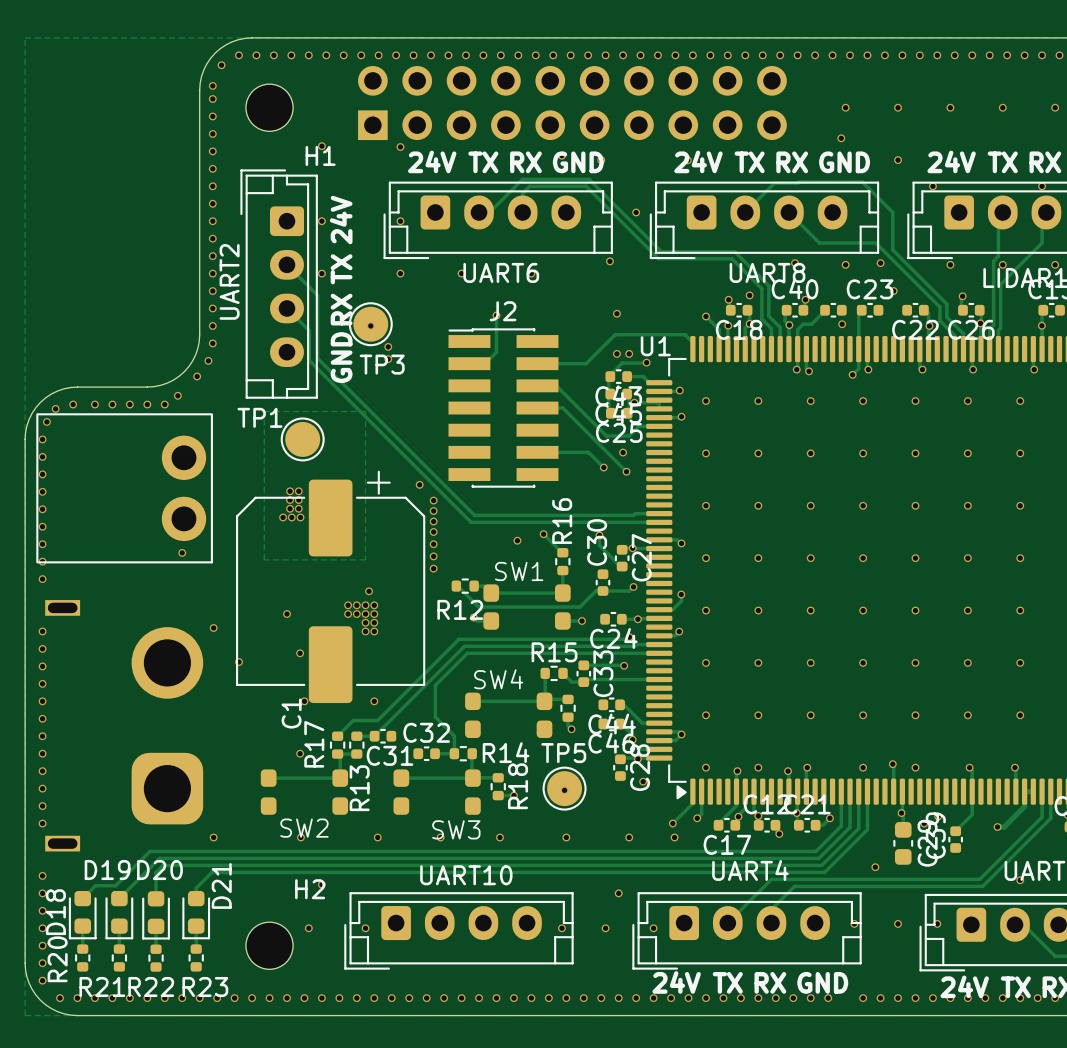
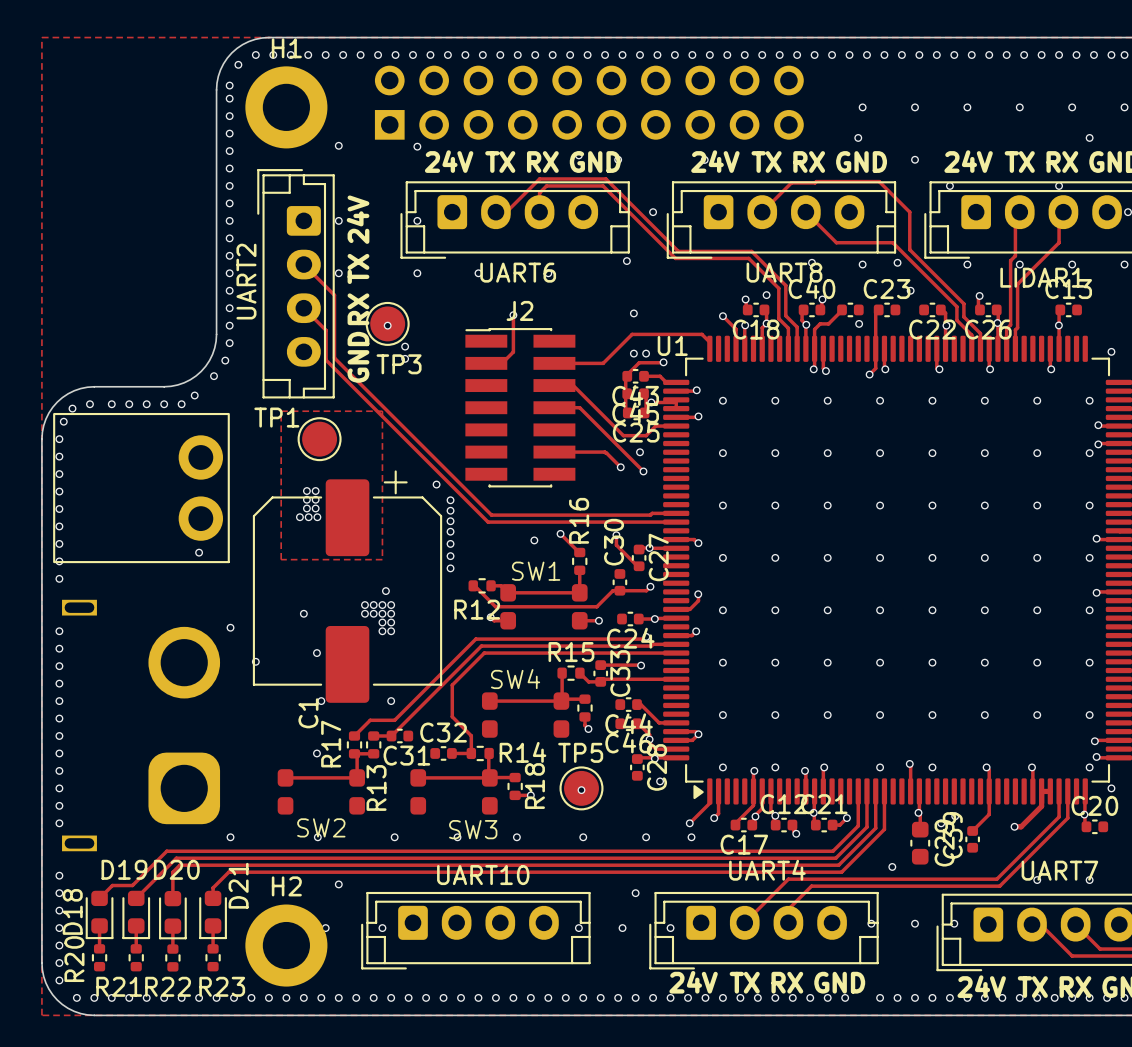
H1 footprint: [245, 84, 294, 132] -> [245, 66, 328, 149]
H1 name position: H1 (320, 155) -> H1 (286, 48)
H2 name position: H2 (310, 889) -> H2 (286, 886)
H2 footprint: [245, 922, 294, 970] -> [245, 904, 328, 987]

